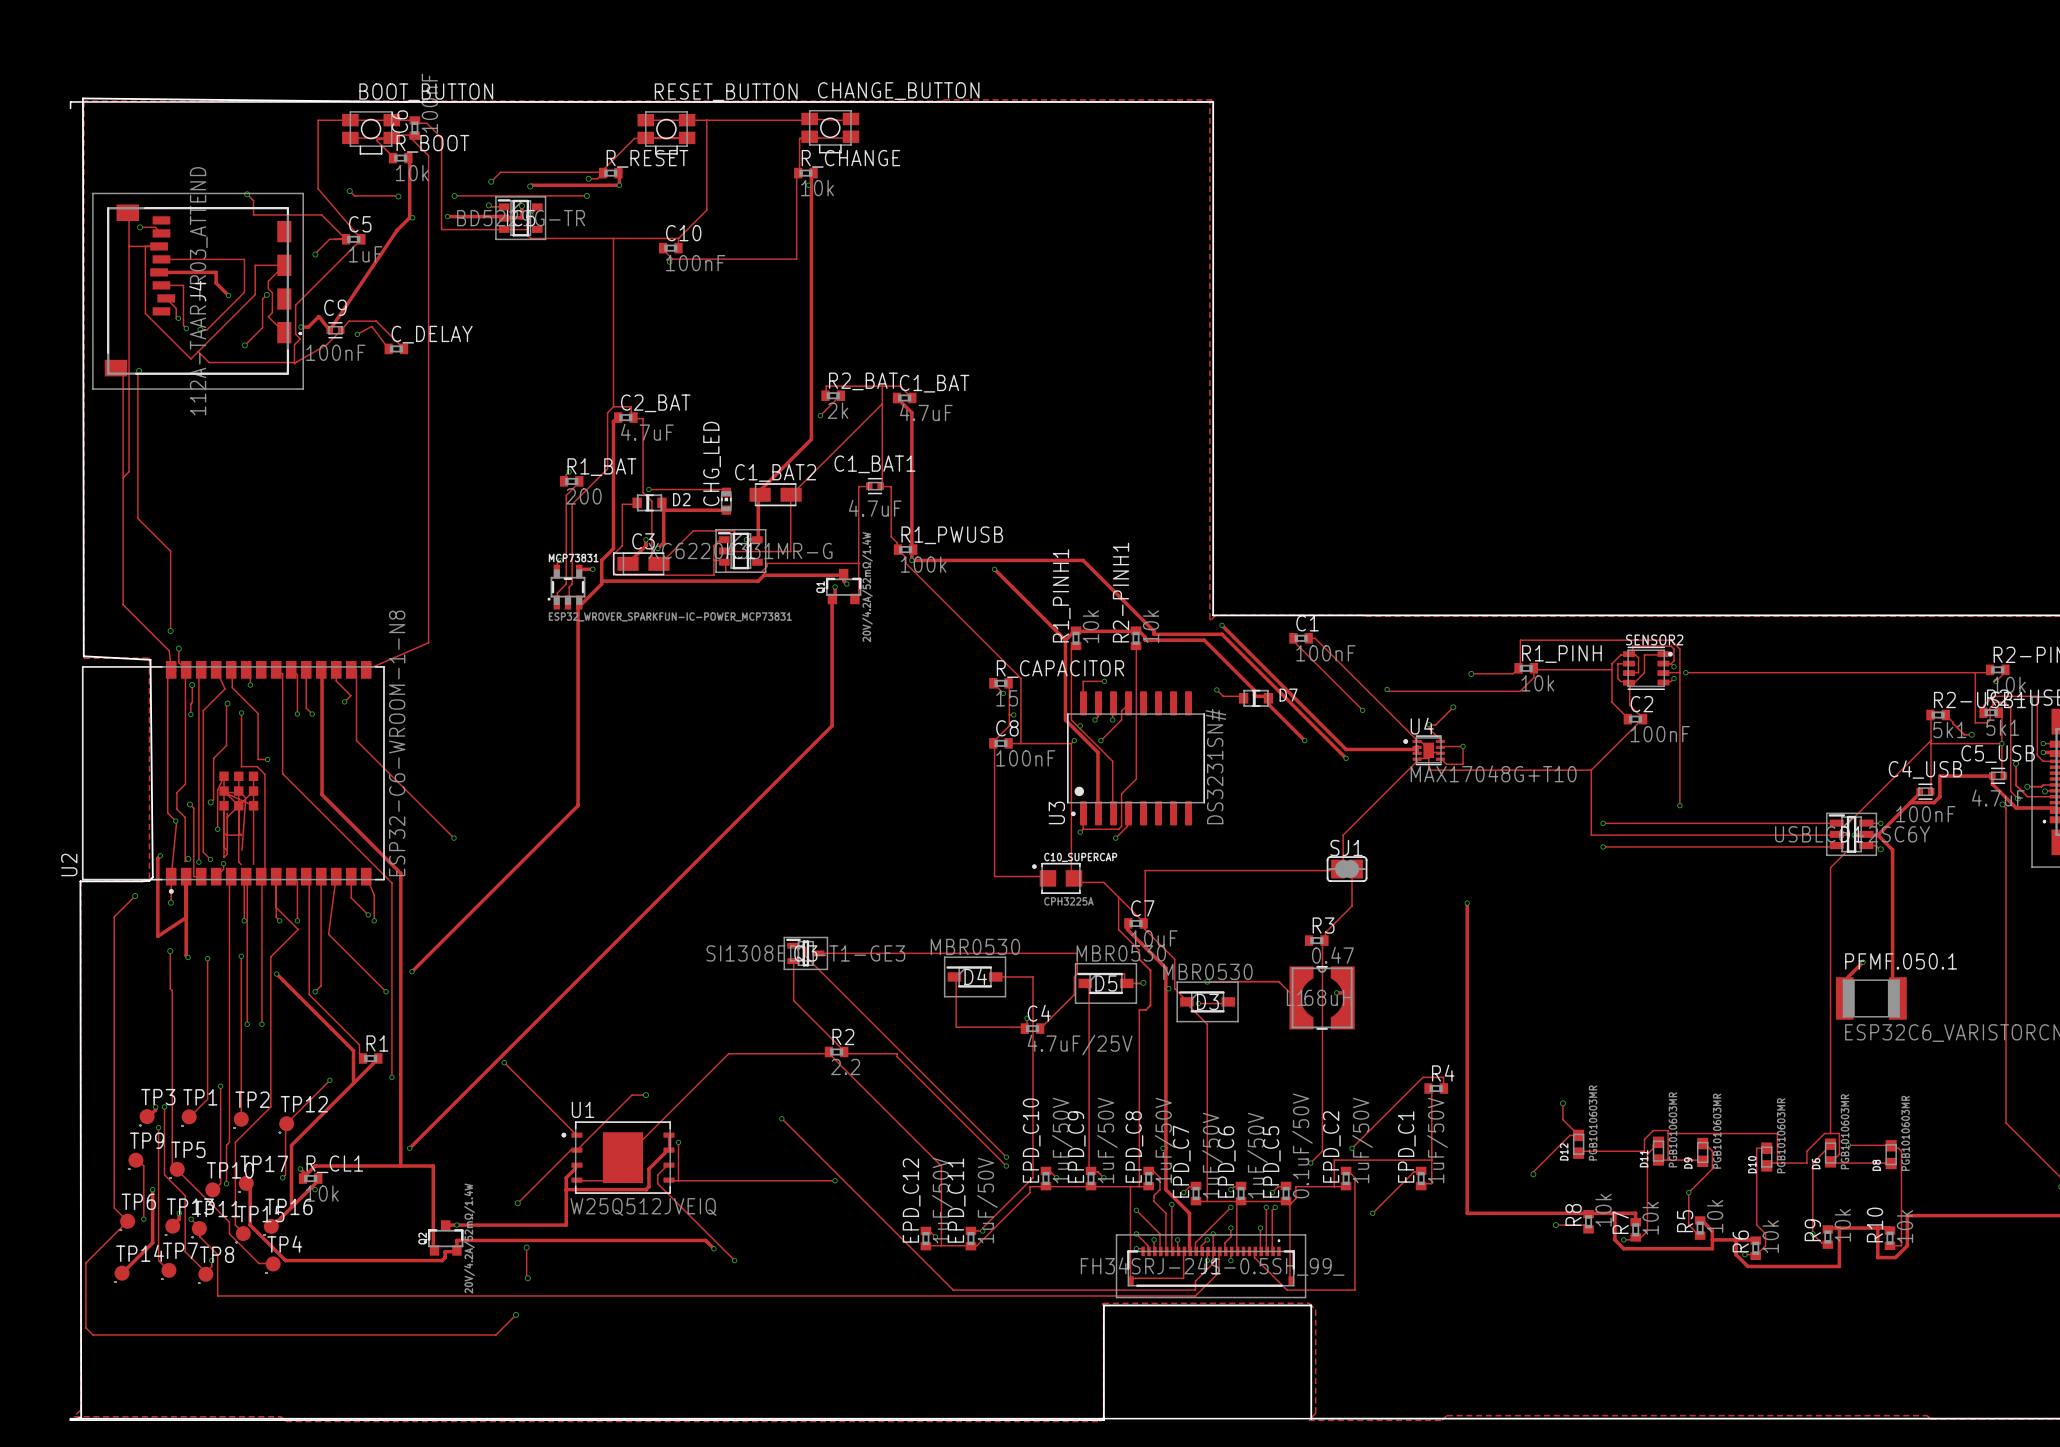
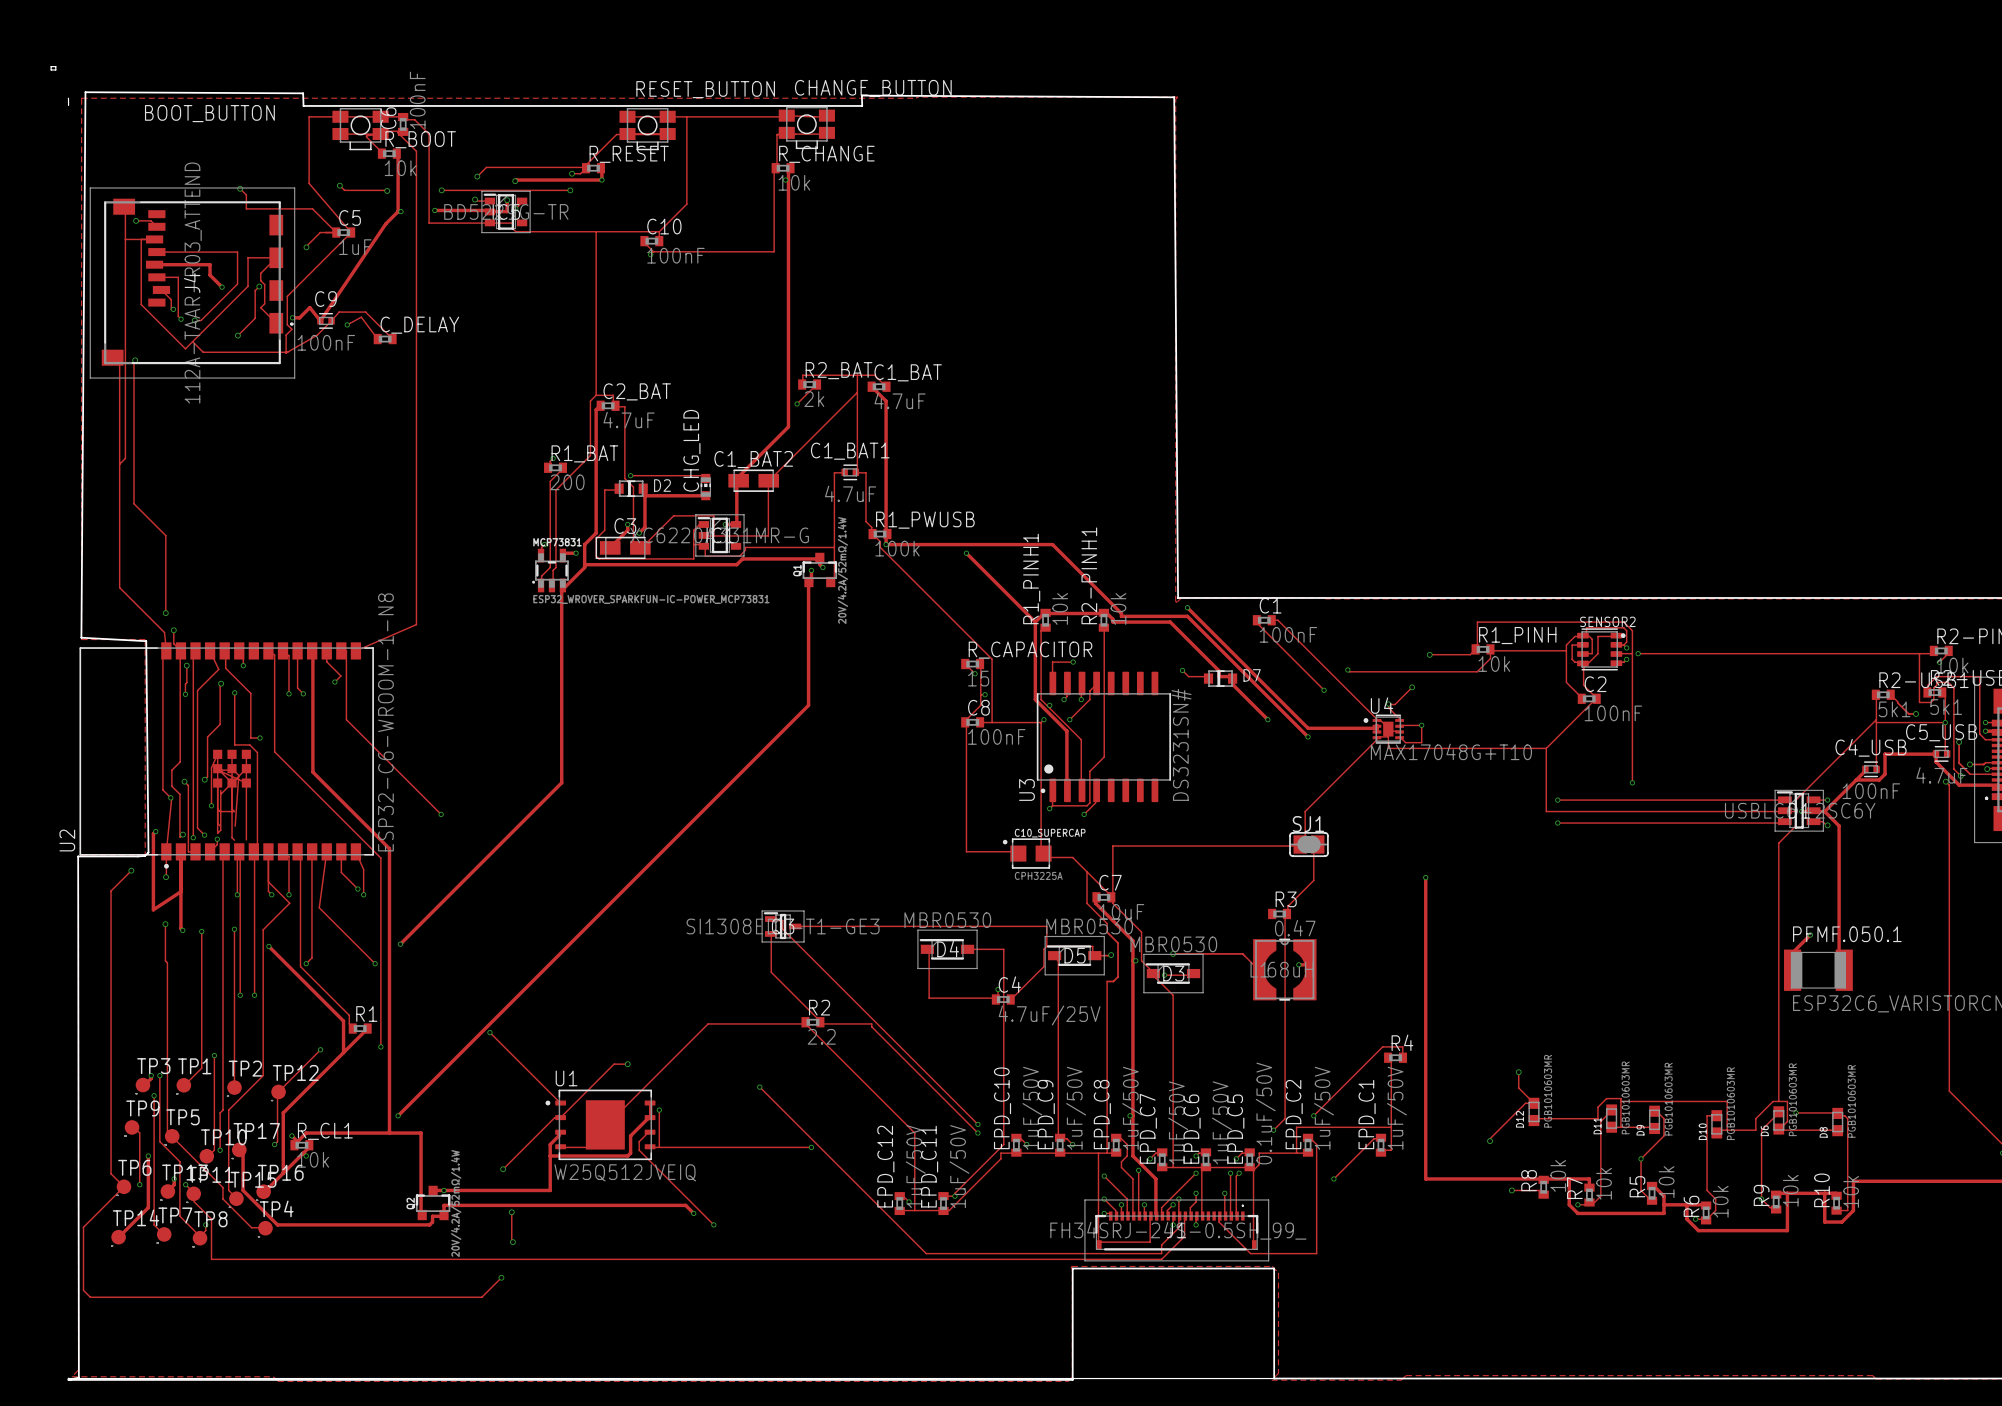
board edge: none -> (51, 66) (55, 66) (55, 69) (51, 69) (51, 66)
BOOT_BUTTON name position: BOOT_BUTTON (426, 92) -> BOOT_BUTTON (209, 113)
board edge: (407, 101) (70, 101) (70, 108) -> (68, 98) (68, 105)
board edge: (407, 101) (1213, 101) (1213, 615) -> (81, 637) (85, 92) (303, 93) (303, 105) (862, 105) (861, 95) (1174, 97) (1178, 597)
board edge: (407, 101) (82, 98) (83, 656) -> none

